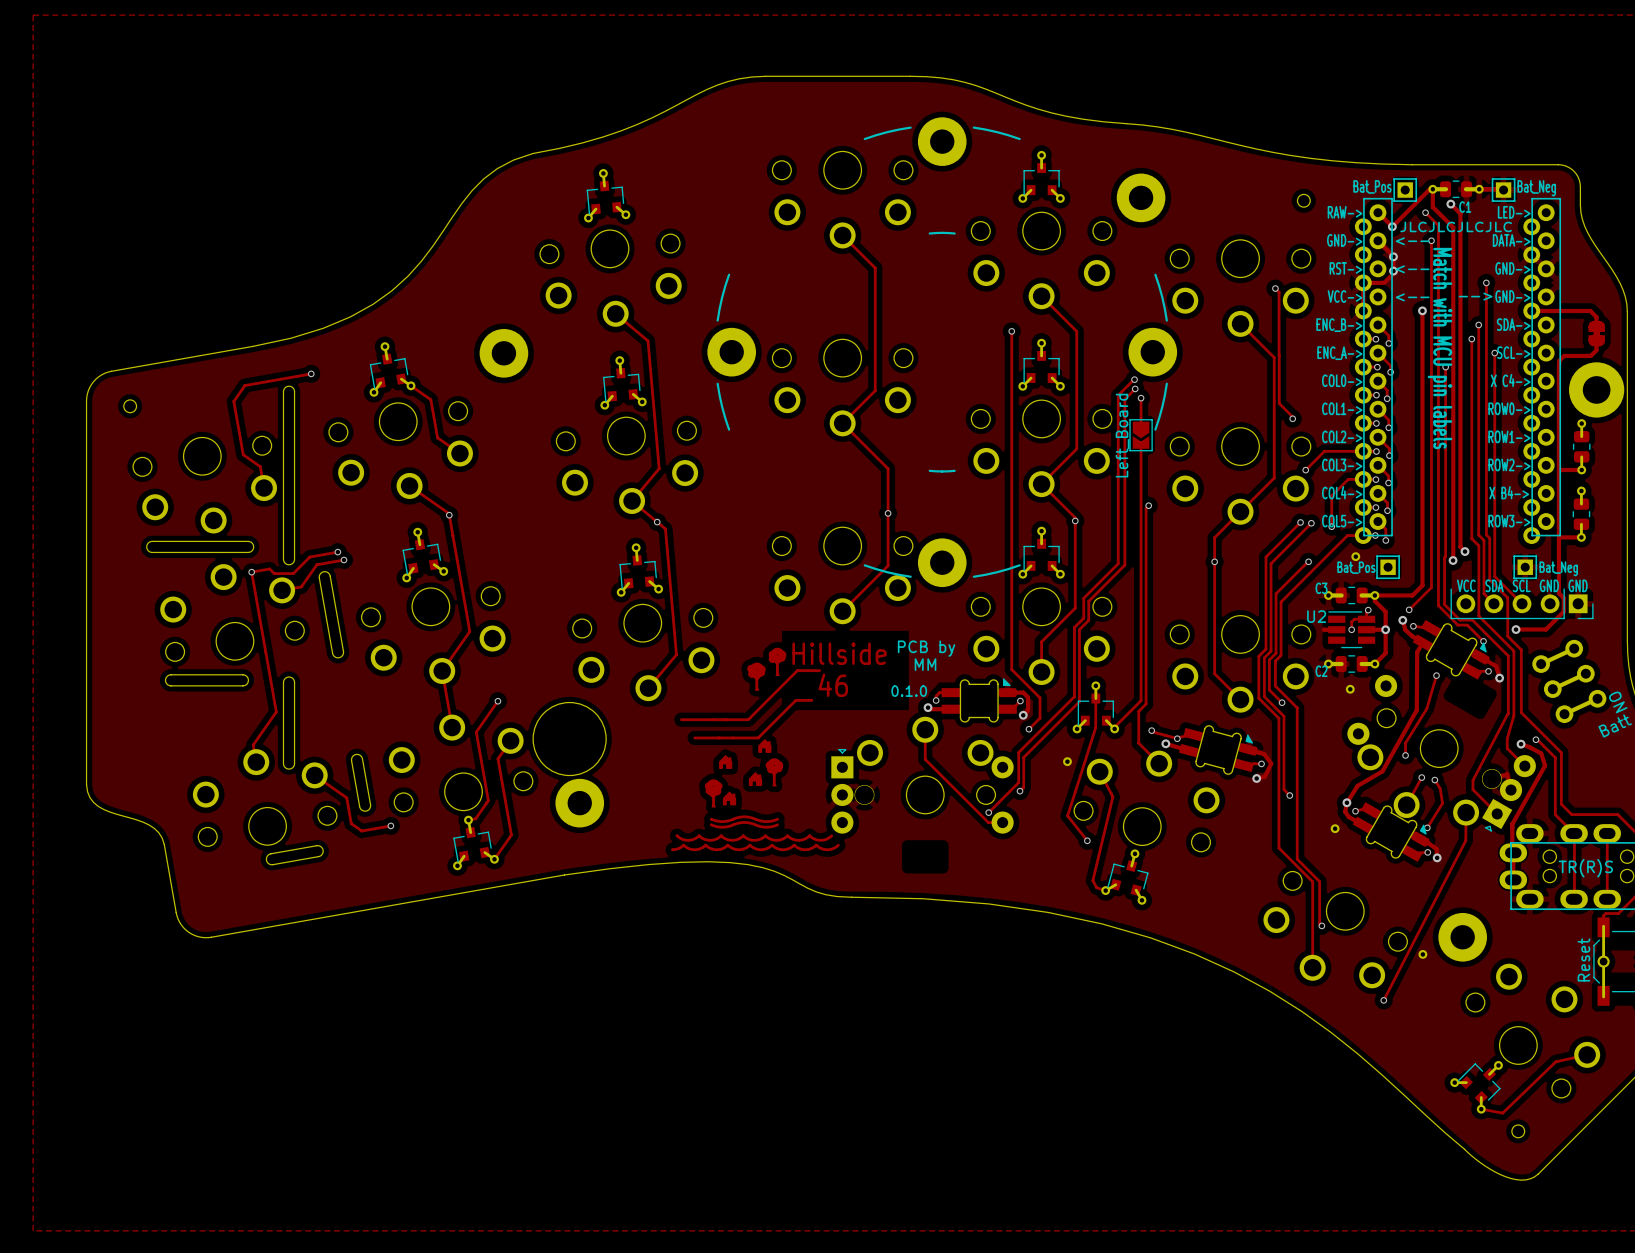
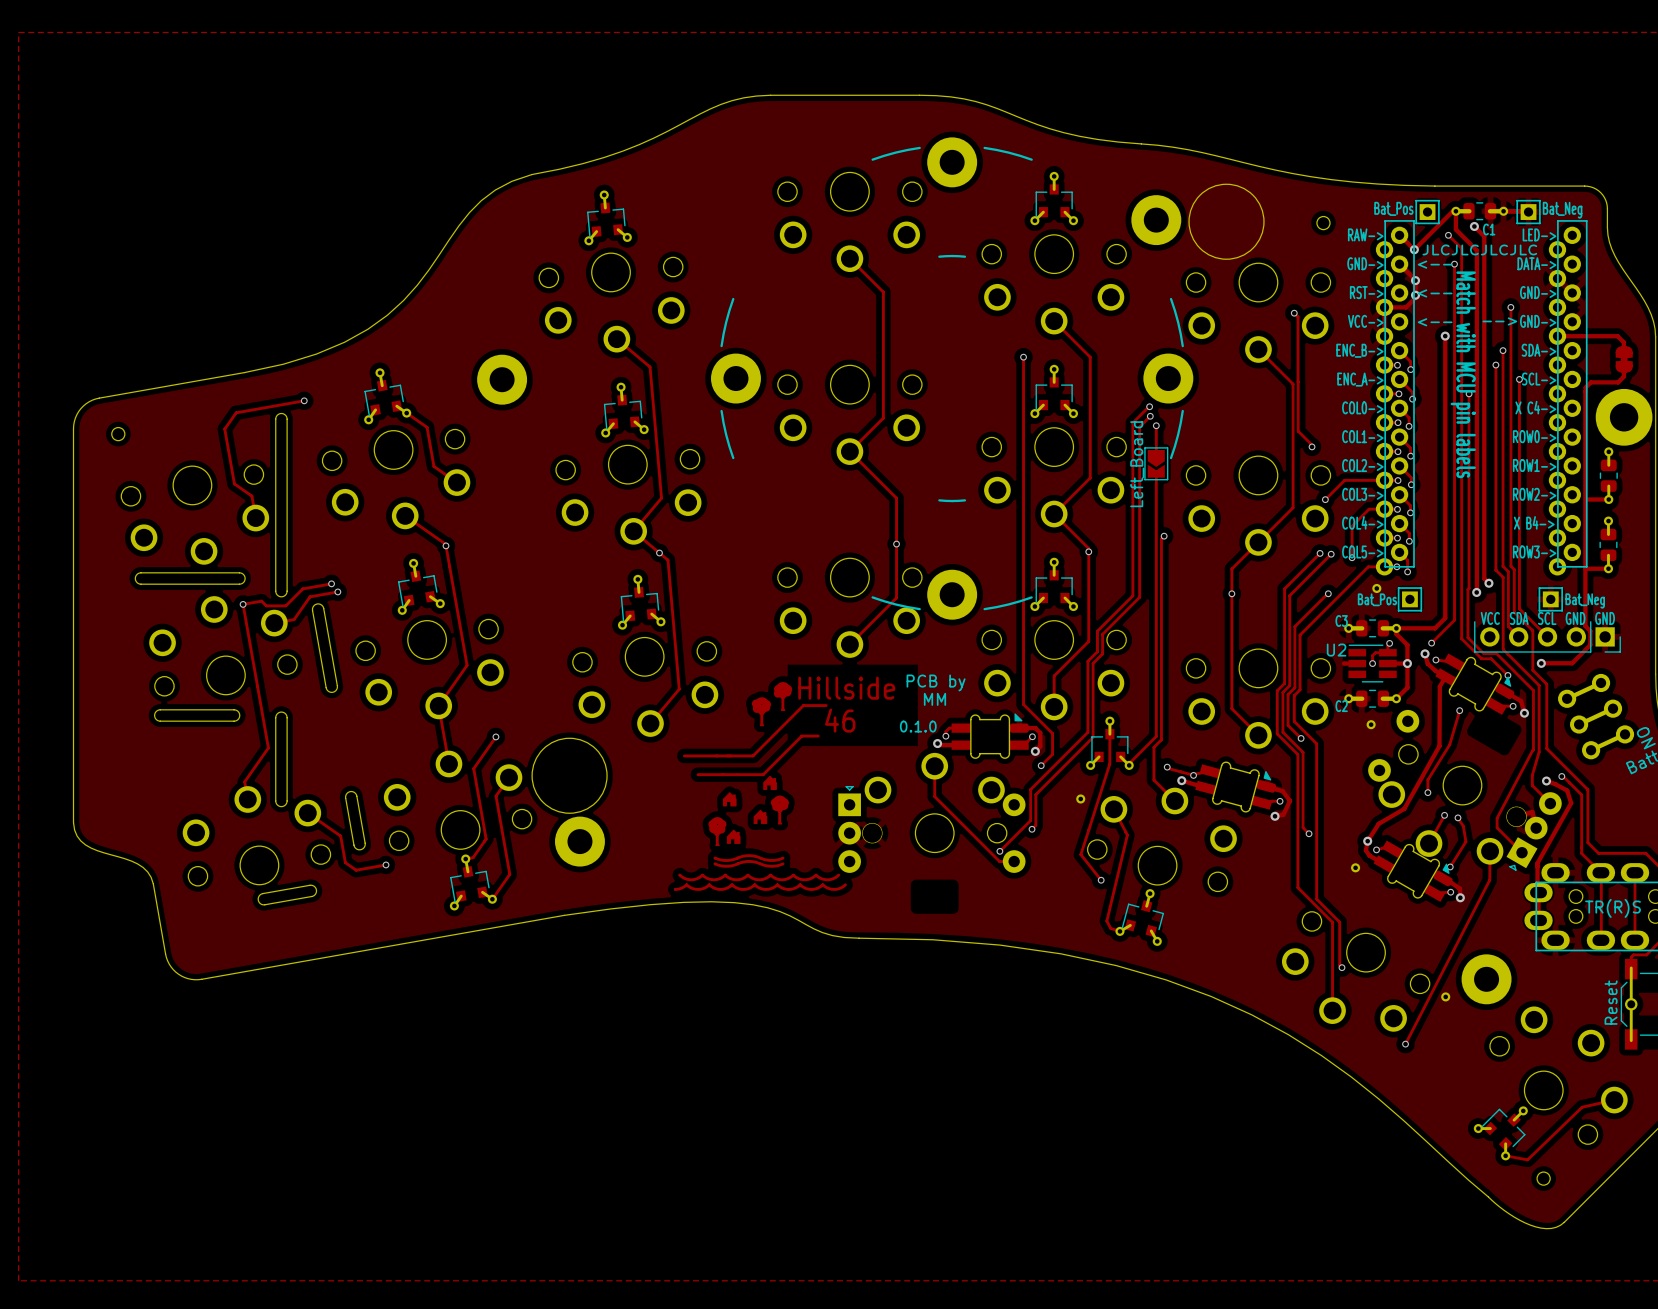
round board edge: none -> [1188, 183, 1265, 260]

